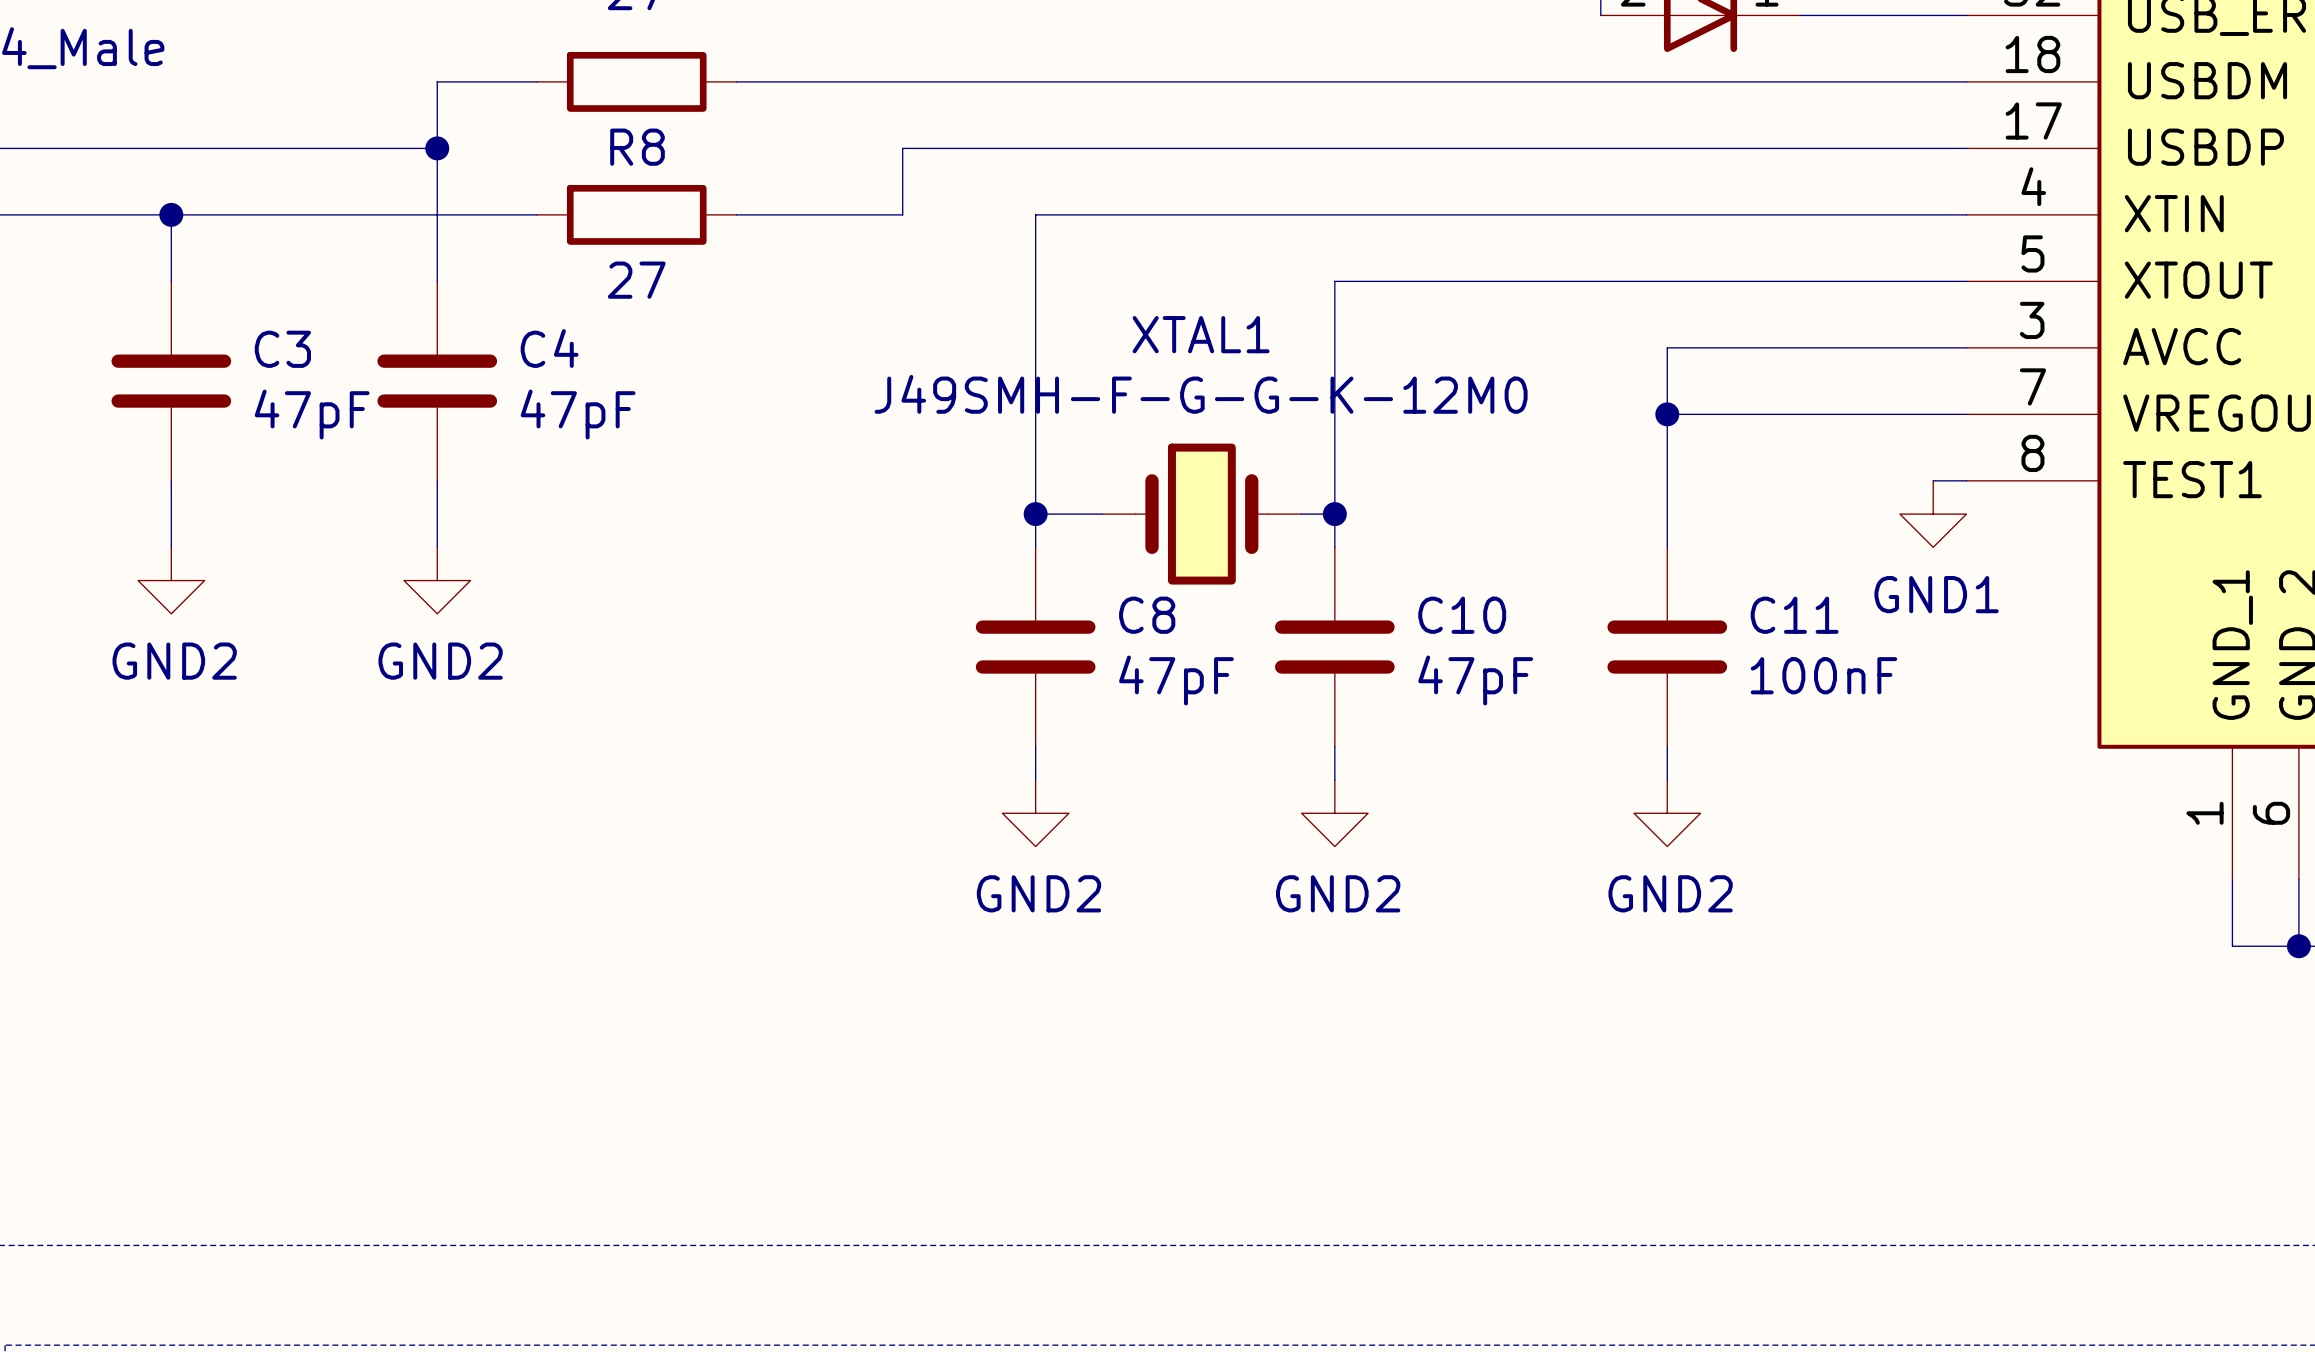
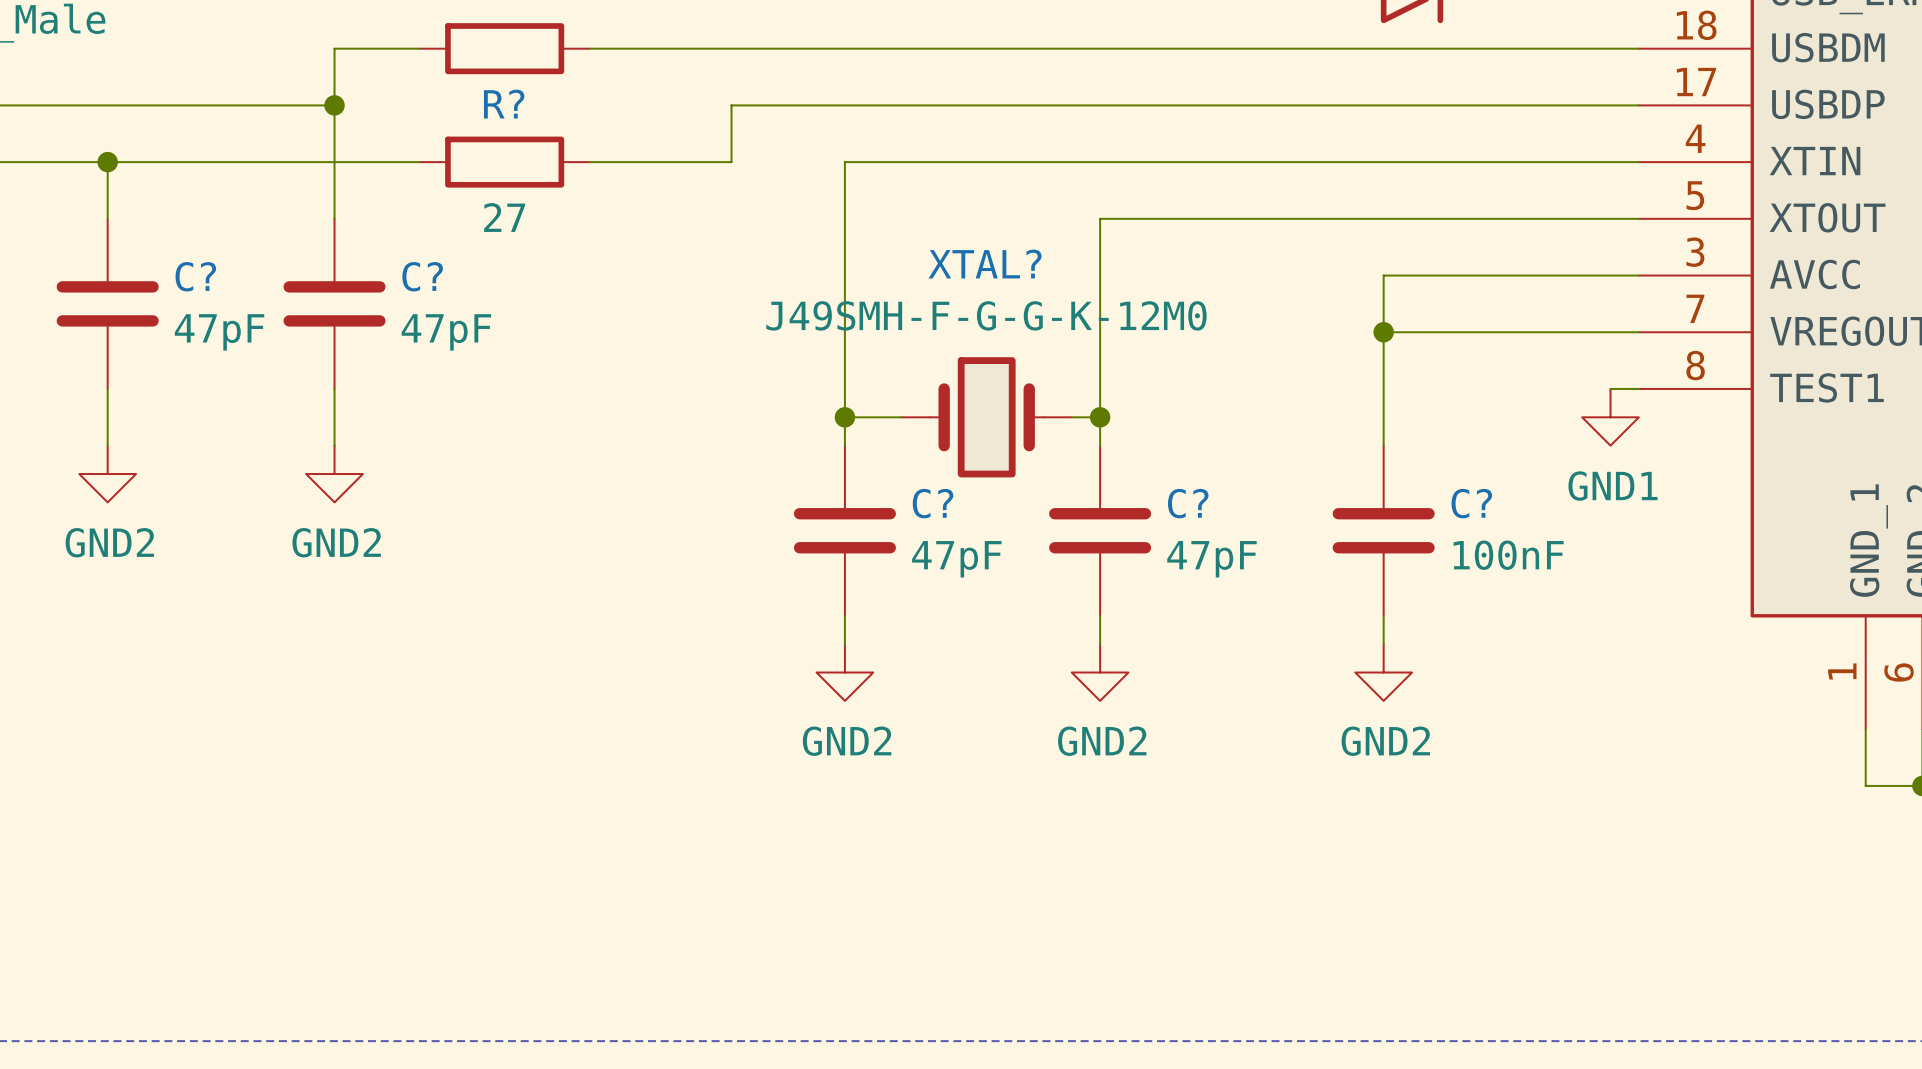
R8 name: R8 (637, 147) -> R? (504, 104)
XTAL1 name: XTAL1 (1201, 334) -> XTAL? (985, 264)
C4 name: C4 (549, 348) -> C? (422, 276)
C3 name: C3 (282, 349) -> C? (195, 276)
C8 name: C8 (1147, 615) -> C? (933, 503)
C10 name: C10 (1462, 615) -> C? (1188, 503)
C11 name: C11 (1794, 615) -> C? (1471, 503)

